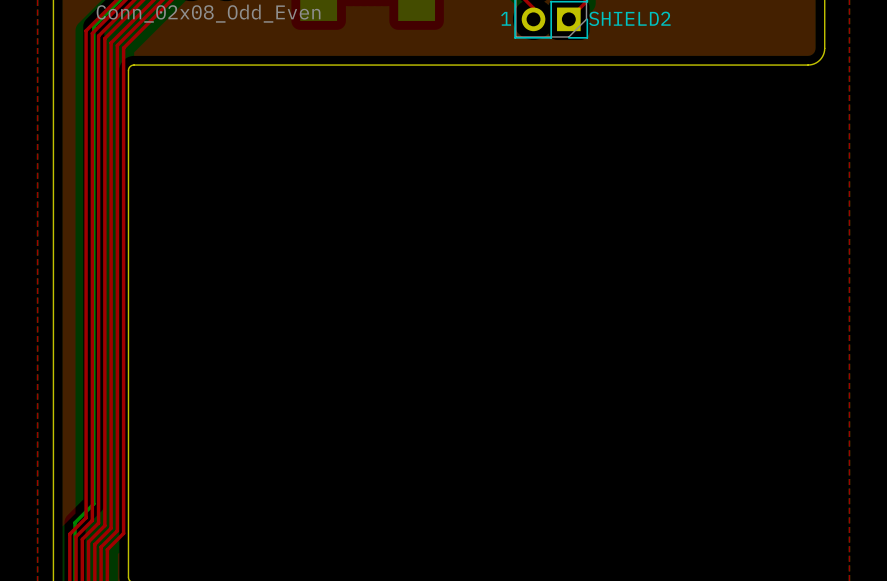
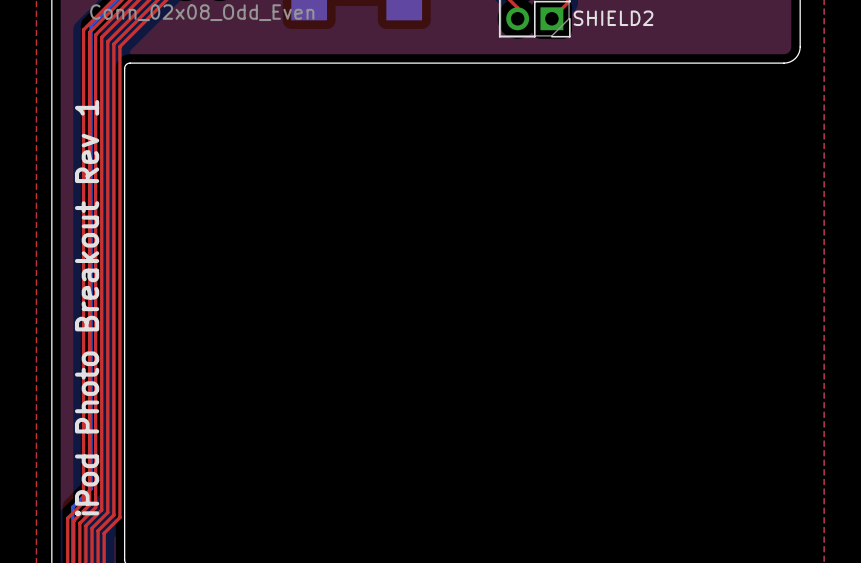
text: 1 (506, 18) -> none
text: none -> iPod Photo Breakout Rev 1 (87, 308)

